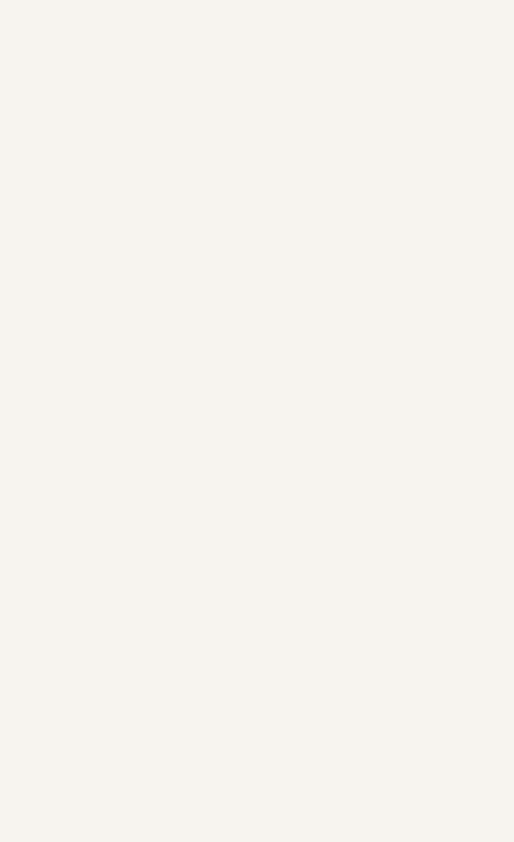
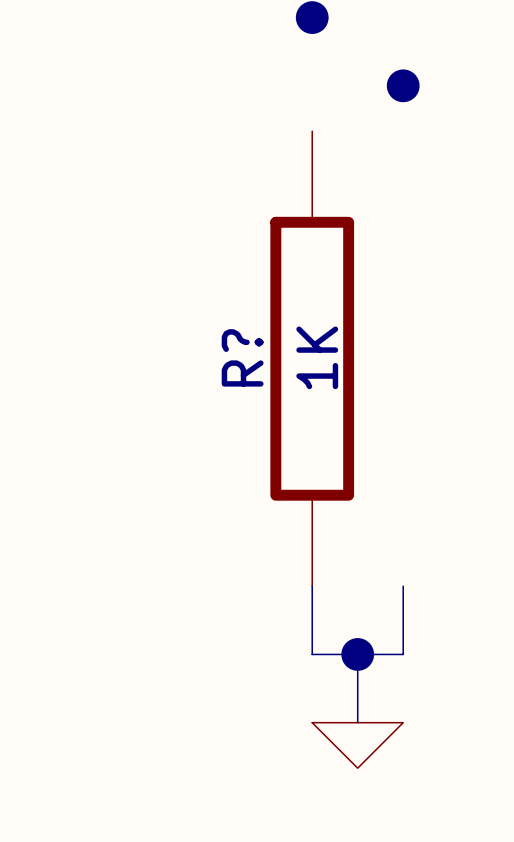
junction: none -> (312, 17)
junction: none -> (403, 85)
R?: none -> 1K (312, 358)
wire: none -> (312, 586) (312, 654) (403, 654) (403, 586)
wire: none -> (357, 654) (357, 722)
junction: none -> (357, 654)
power symbol: none -> (357, 745)

